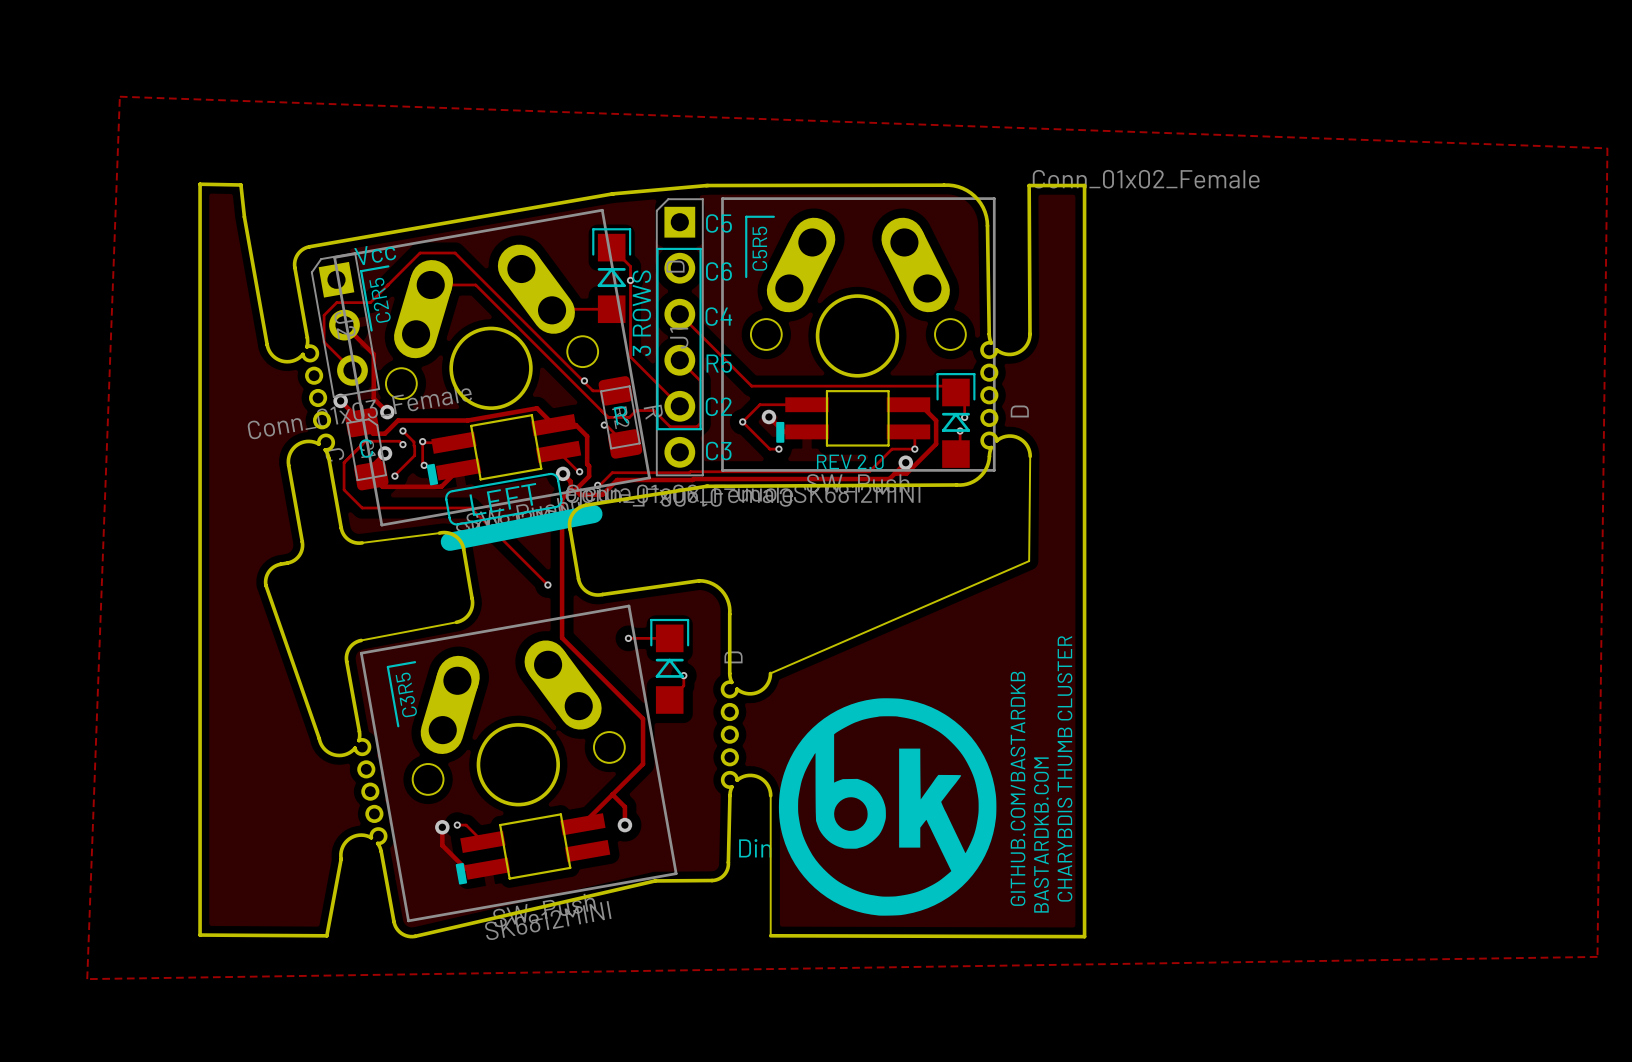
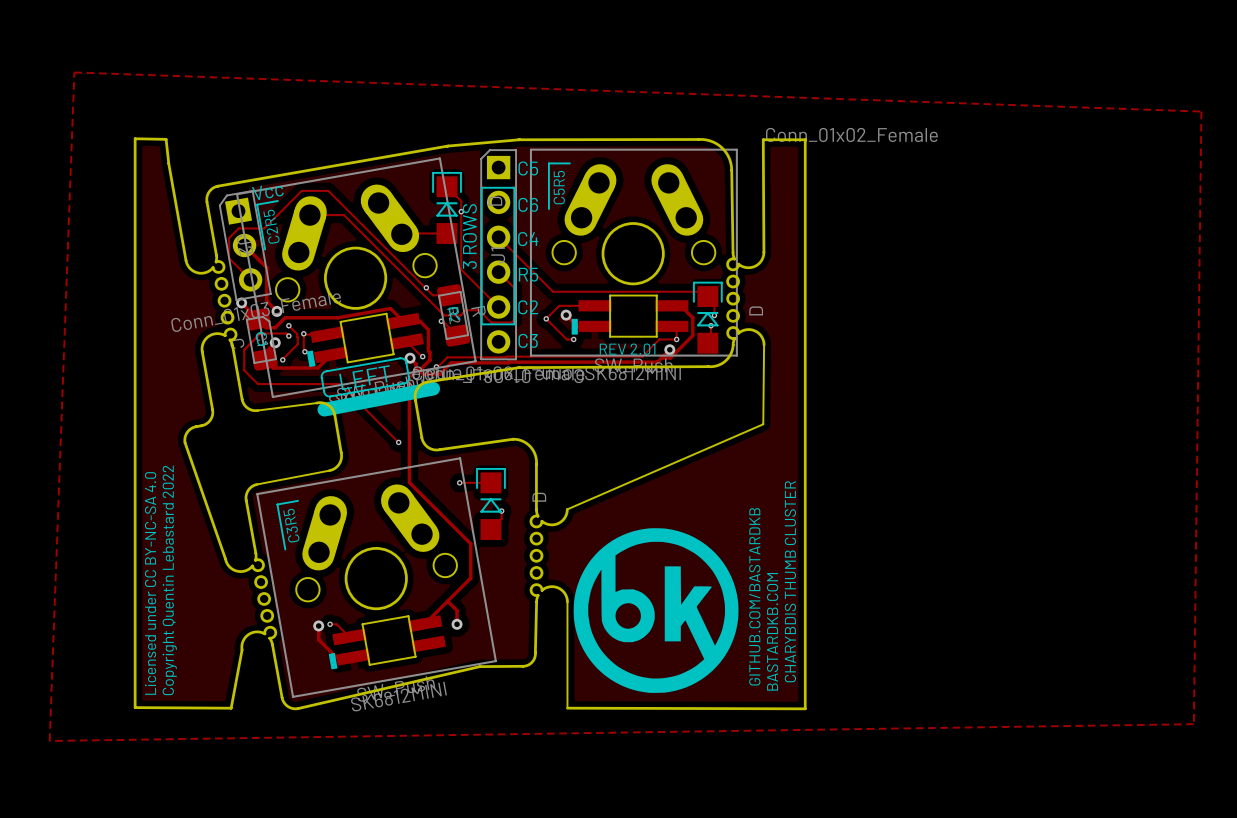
text: REV 2.0 (850, 461) -> REV 2.01 (627, 349)
text: none -> Copyright Quentin Lebastard 2022 (169, 580)
text: none -> Licensed under CC BY-NC-SA 4.0 (150, 583)
text: Din (755, 848) -> none

